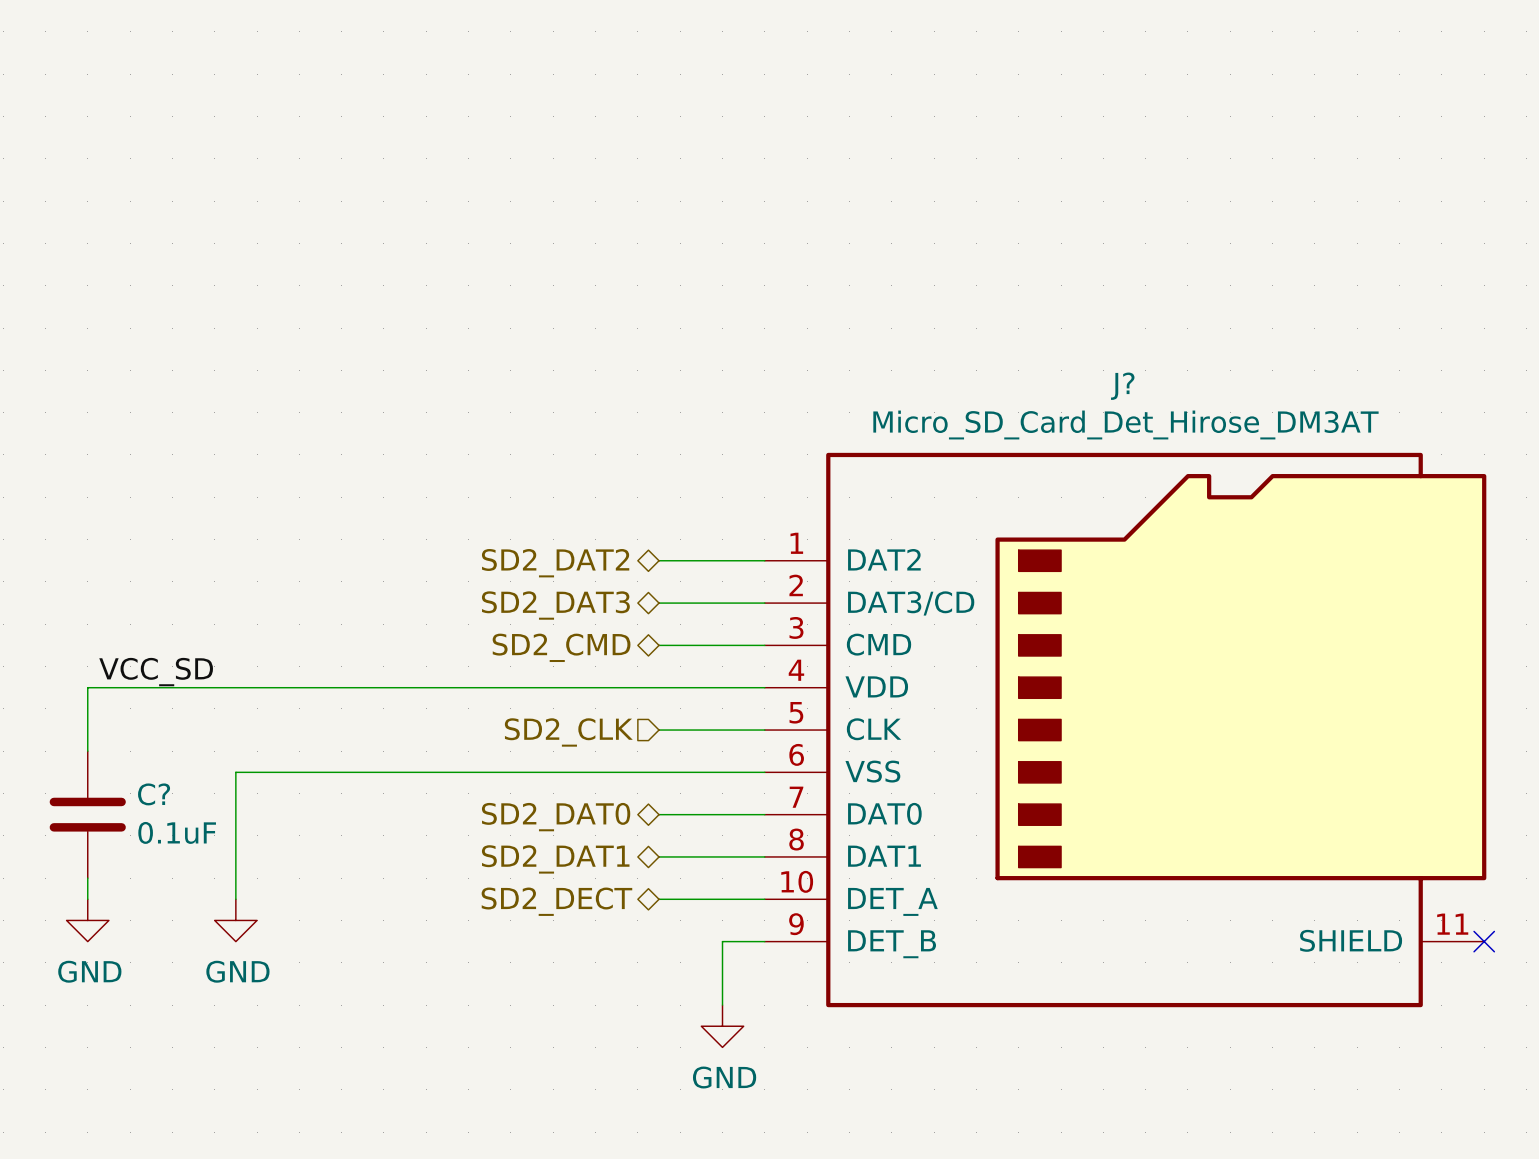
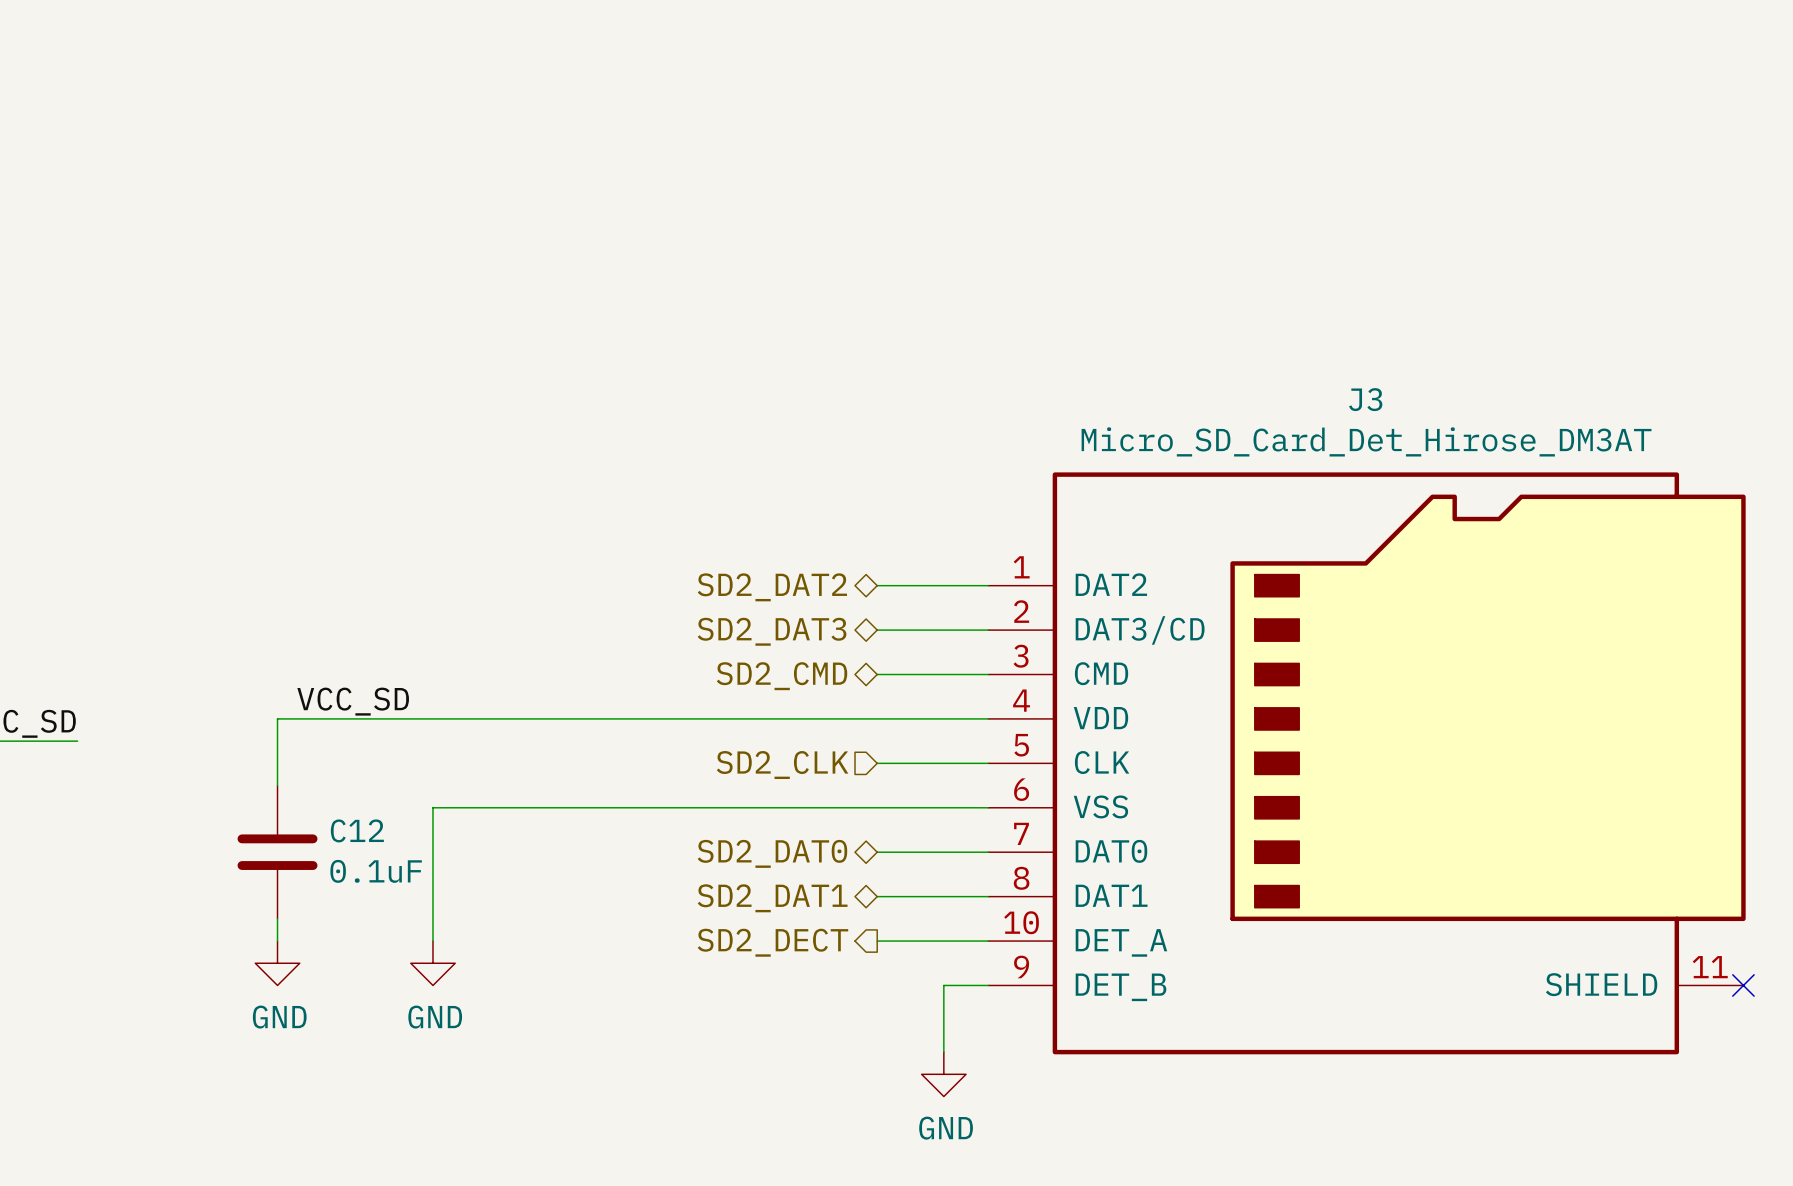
J? name: J? (1122, 386) -> J3 (1365, 399)
C? name: C? (154, 794) -> C12 (357, 830)
hierarchical label shape: bidirectional (556, 901) -> output (772, 942)

